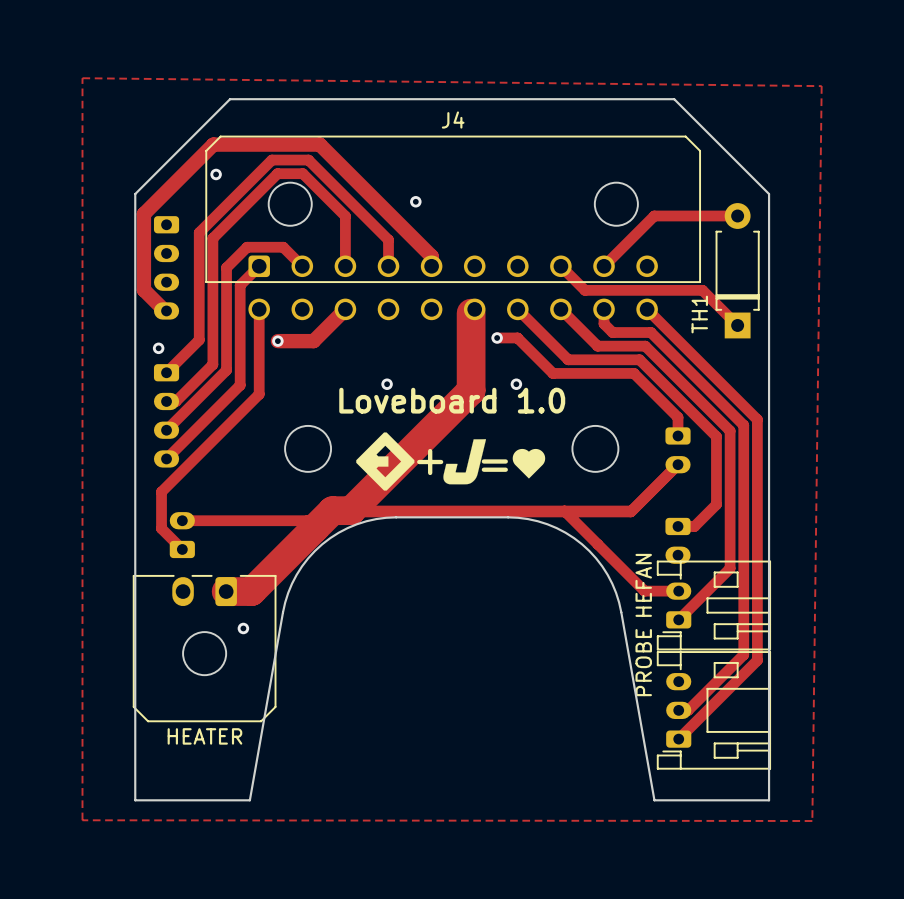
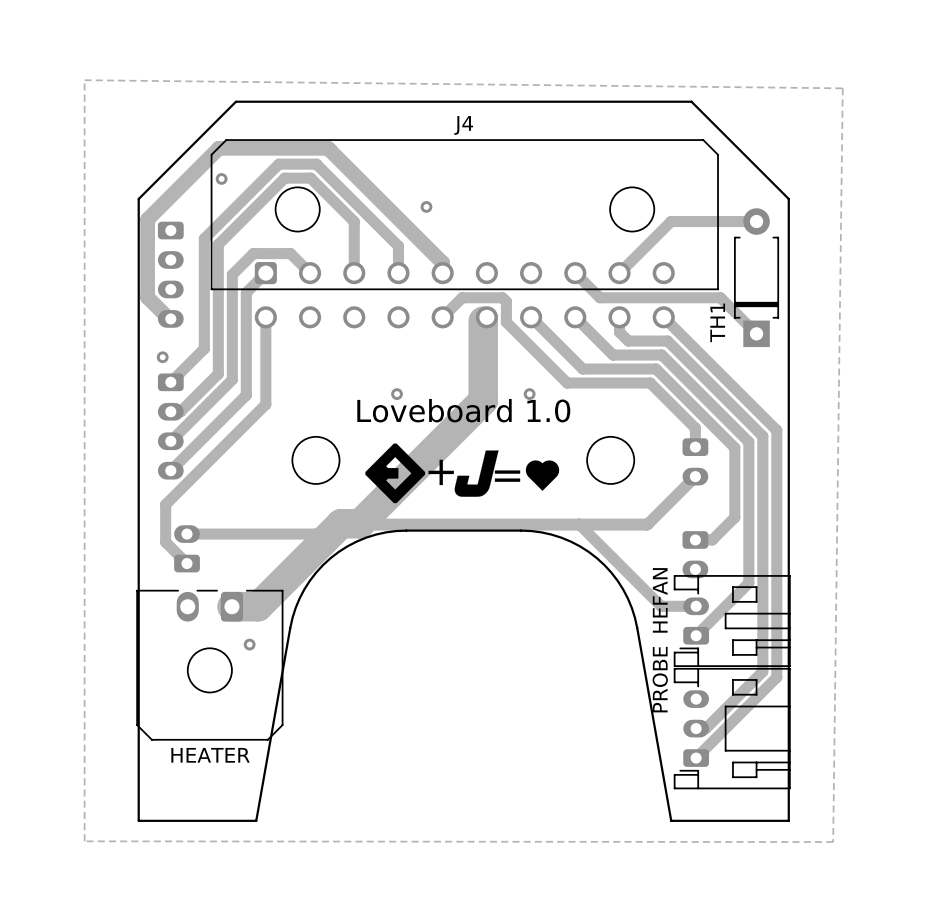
track: (345, 309) (313, 341) (277, 341) -> none
track: (497, 337) (517, 337) -> (442, 317) (462, 297) (502, 297) (506, 301) (506, 322) (530, 346)
via: (497, 337) -> none
via: (277, 341) -> none

